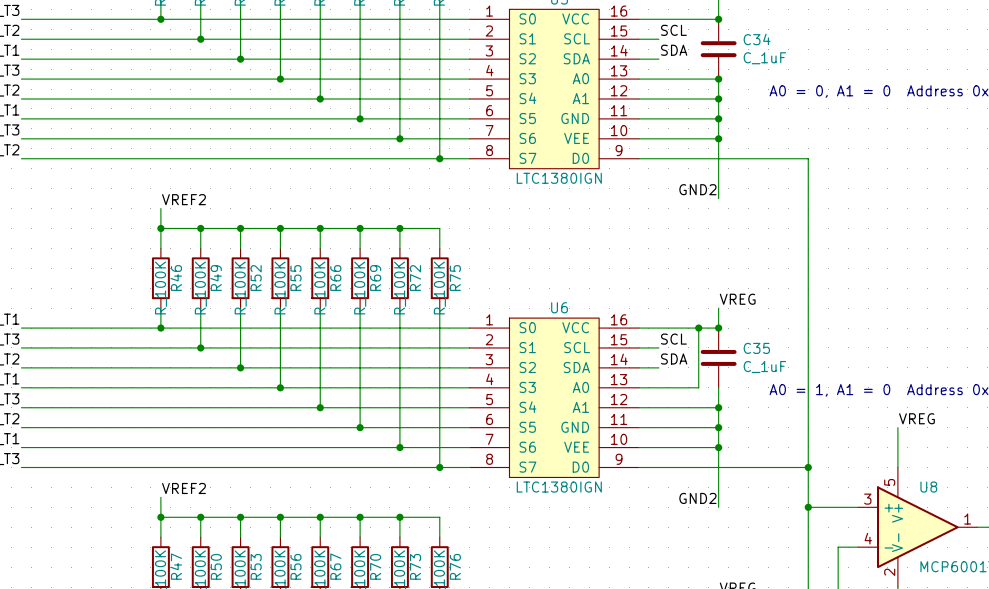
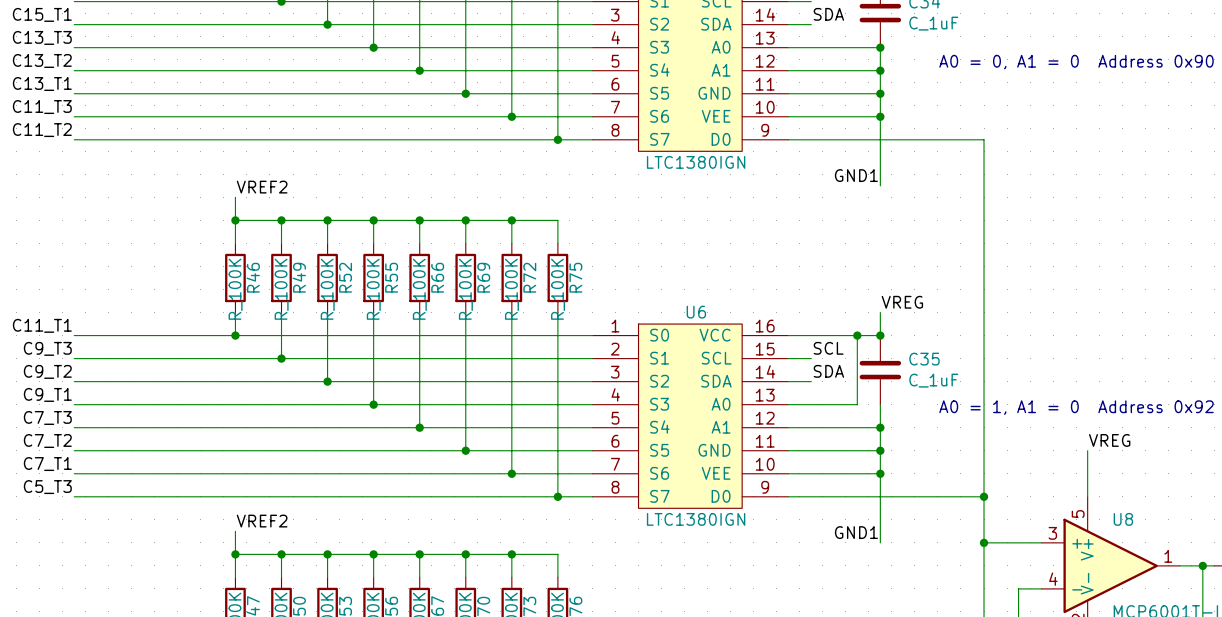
label: GND2 (697, 189) -> GND1 (856, 175)
label: GND2 (697, 498) -> GND1 (856, 532)

